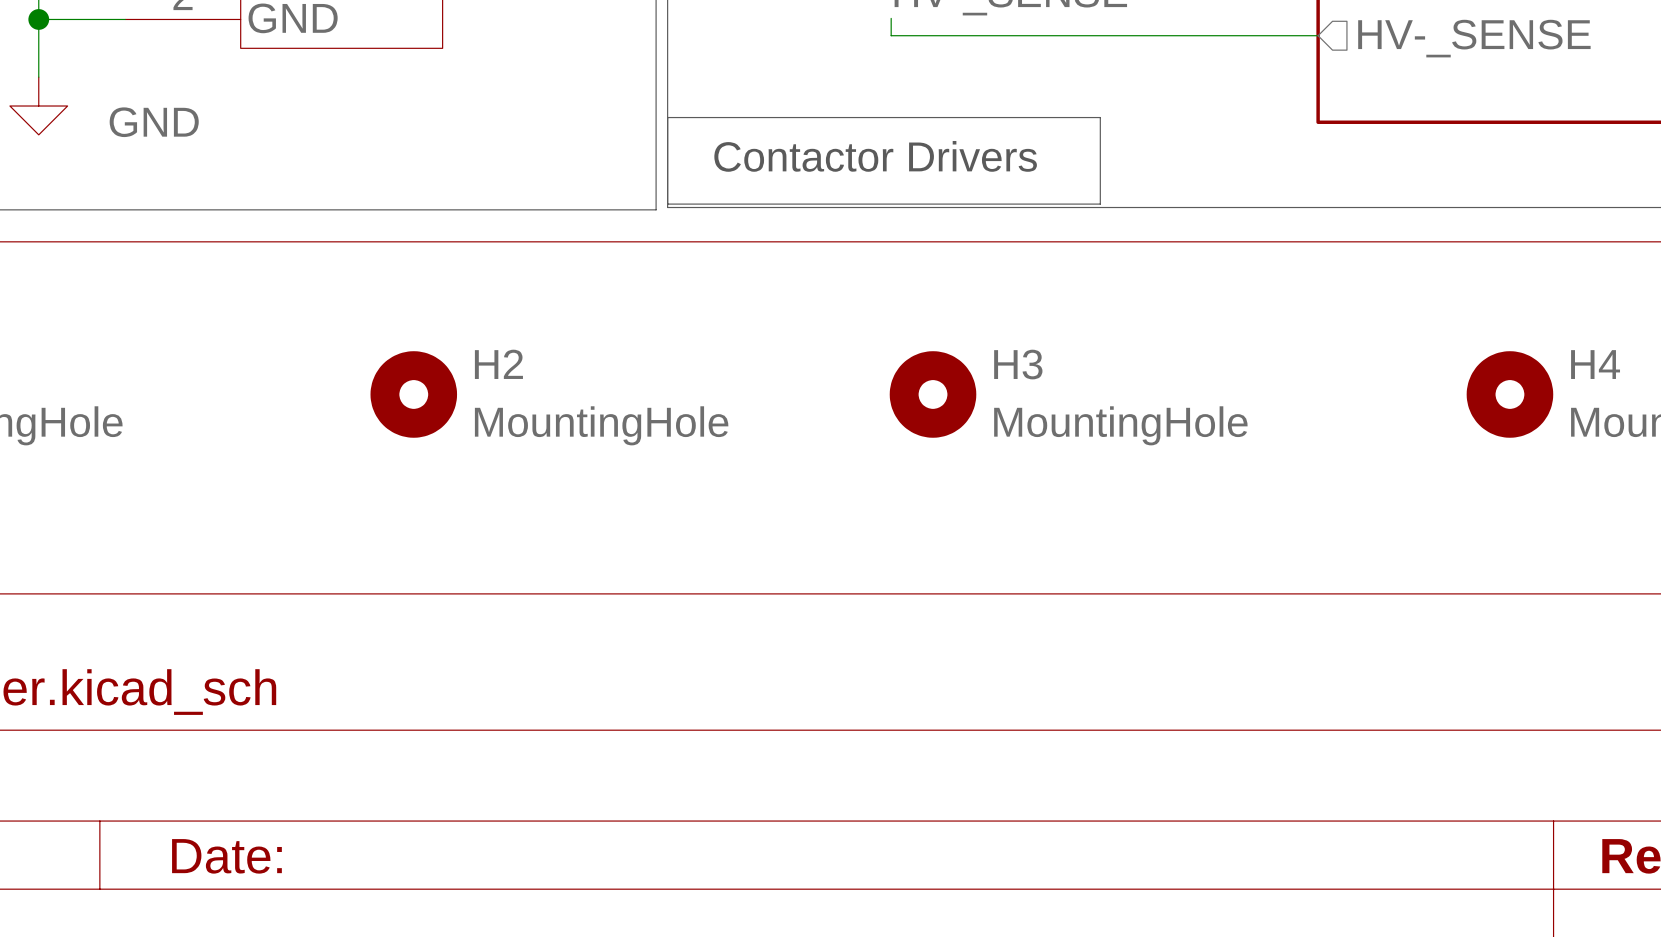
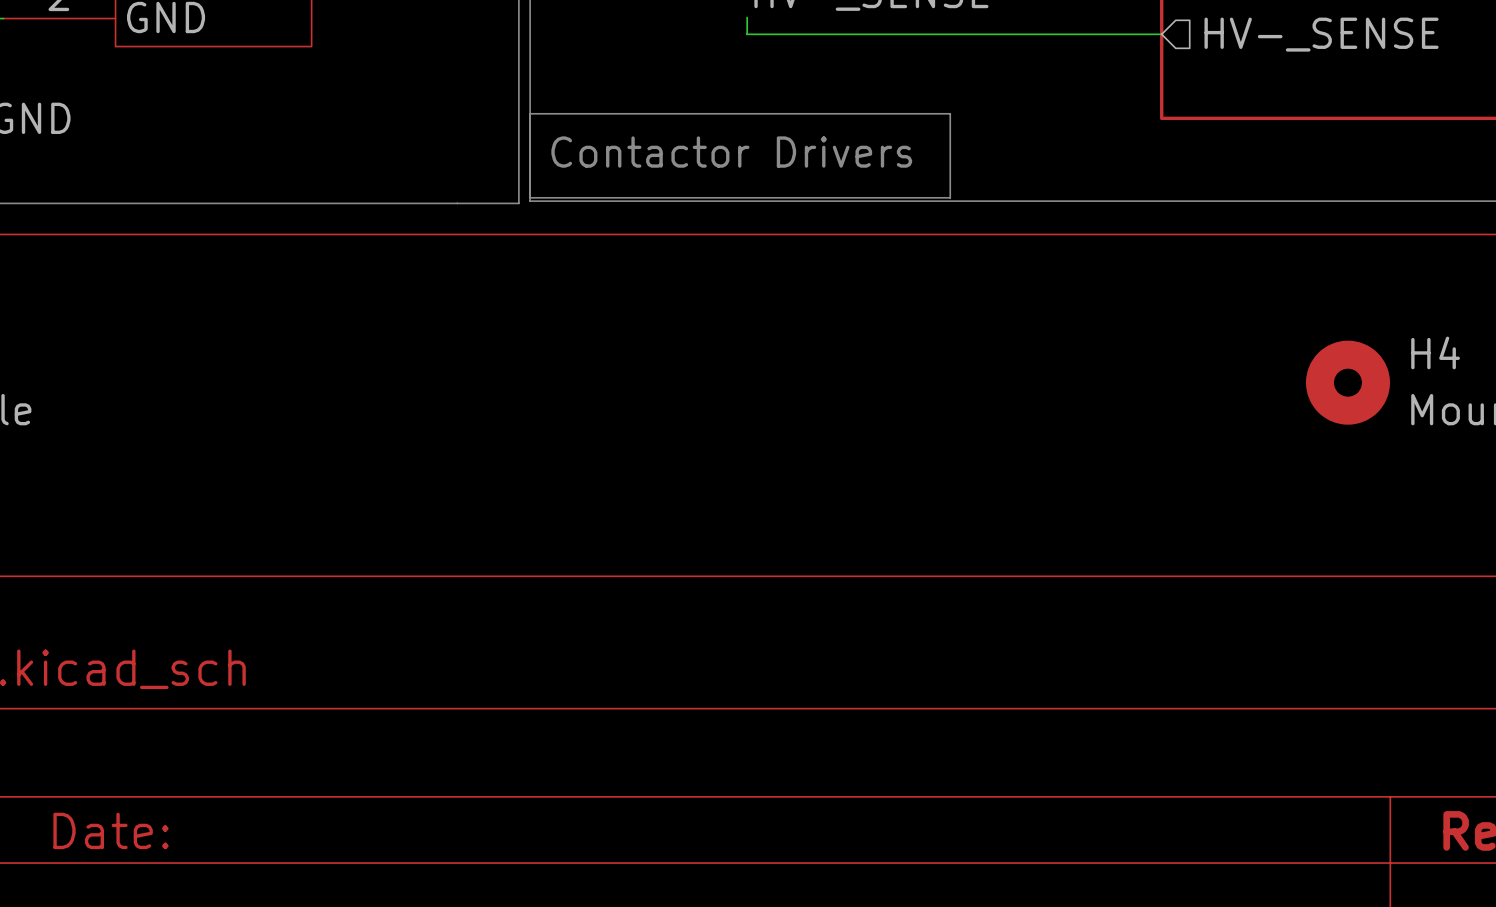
H2: MountingHole (413, 394) -> none
H3: MountingHole (933, 394) -> none

